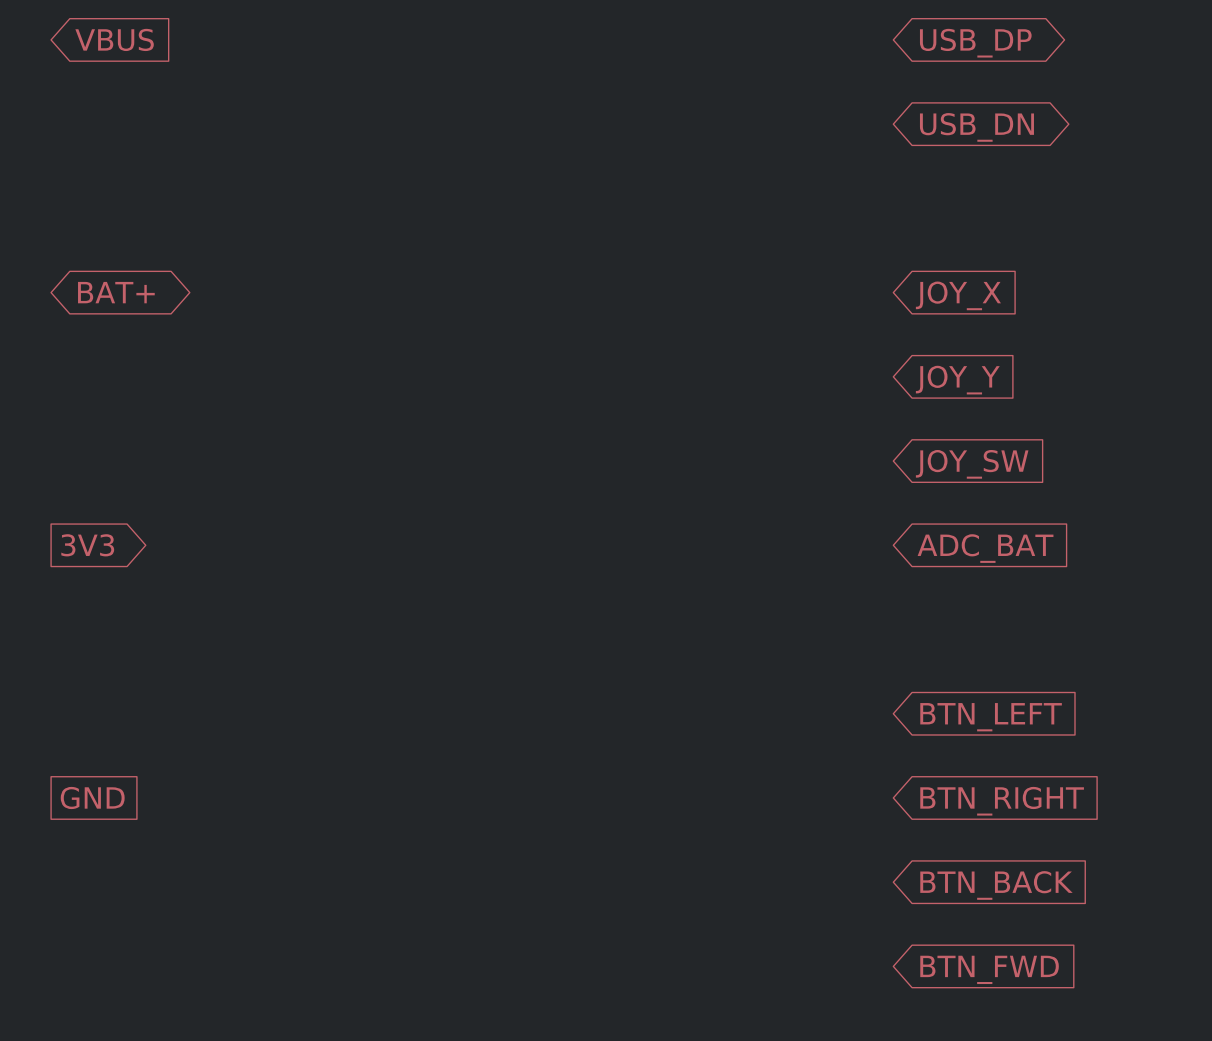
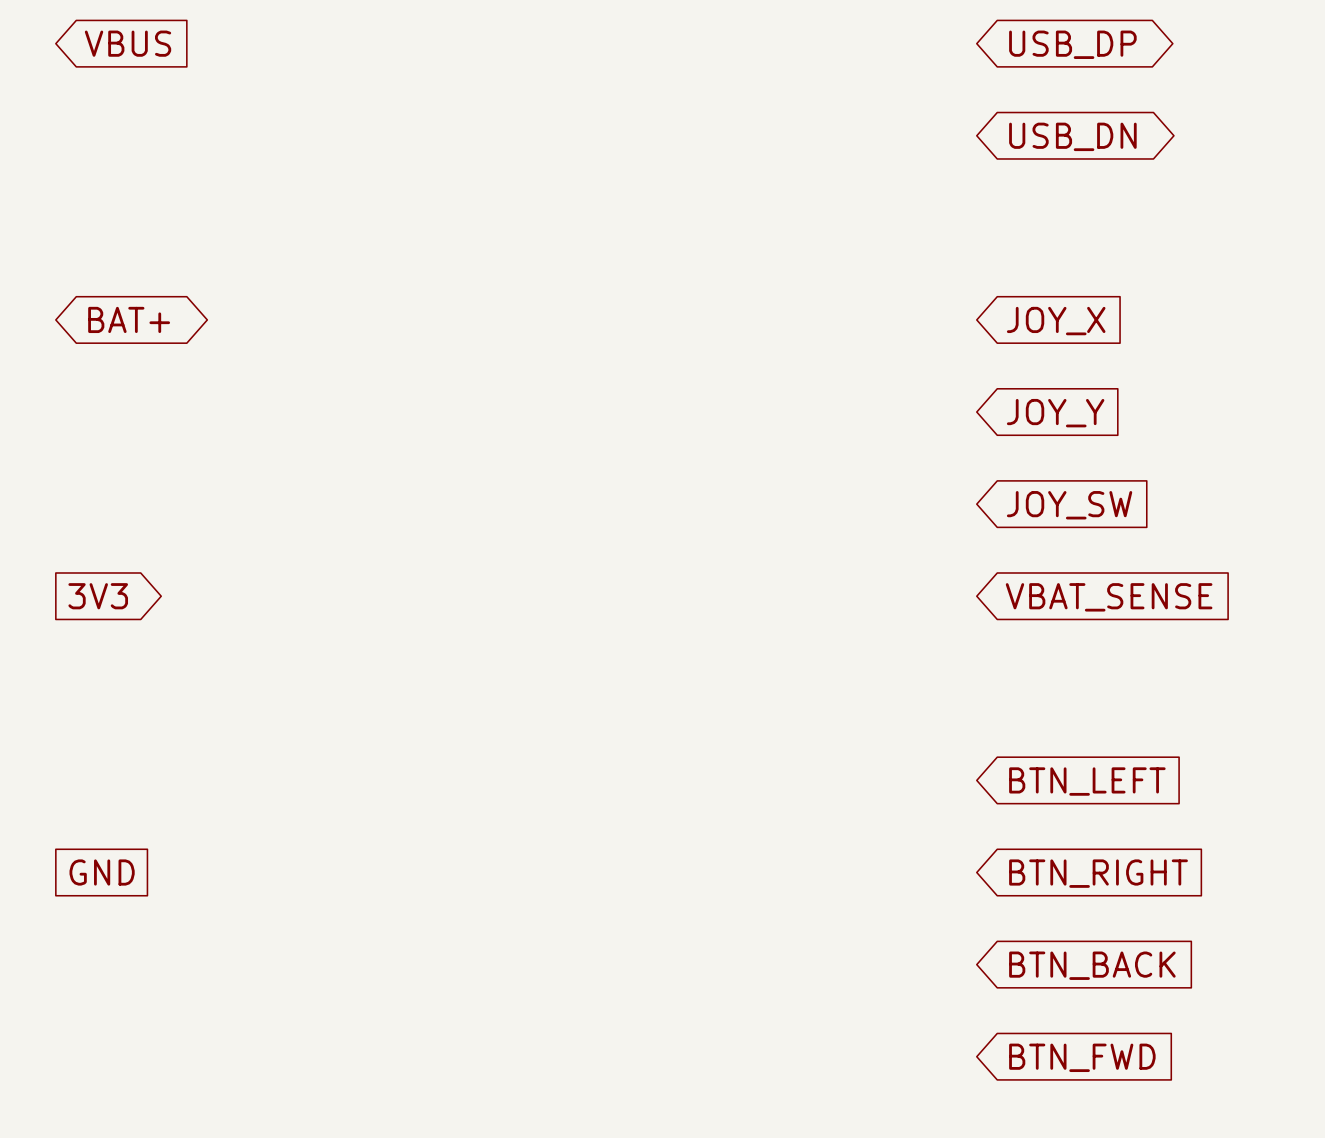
global label: ADC_BAT (985, 548) -> VBAT_SENSE (1109, 597)

